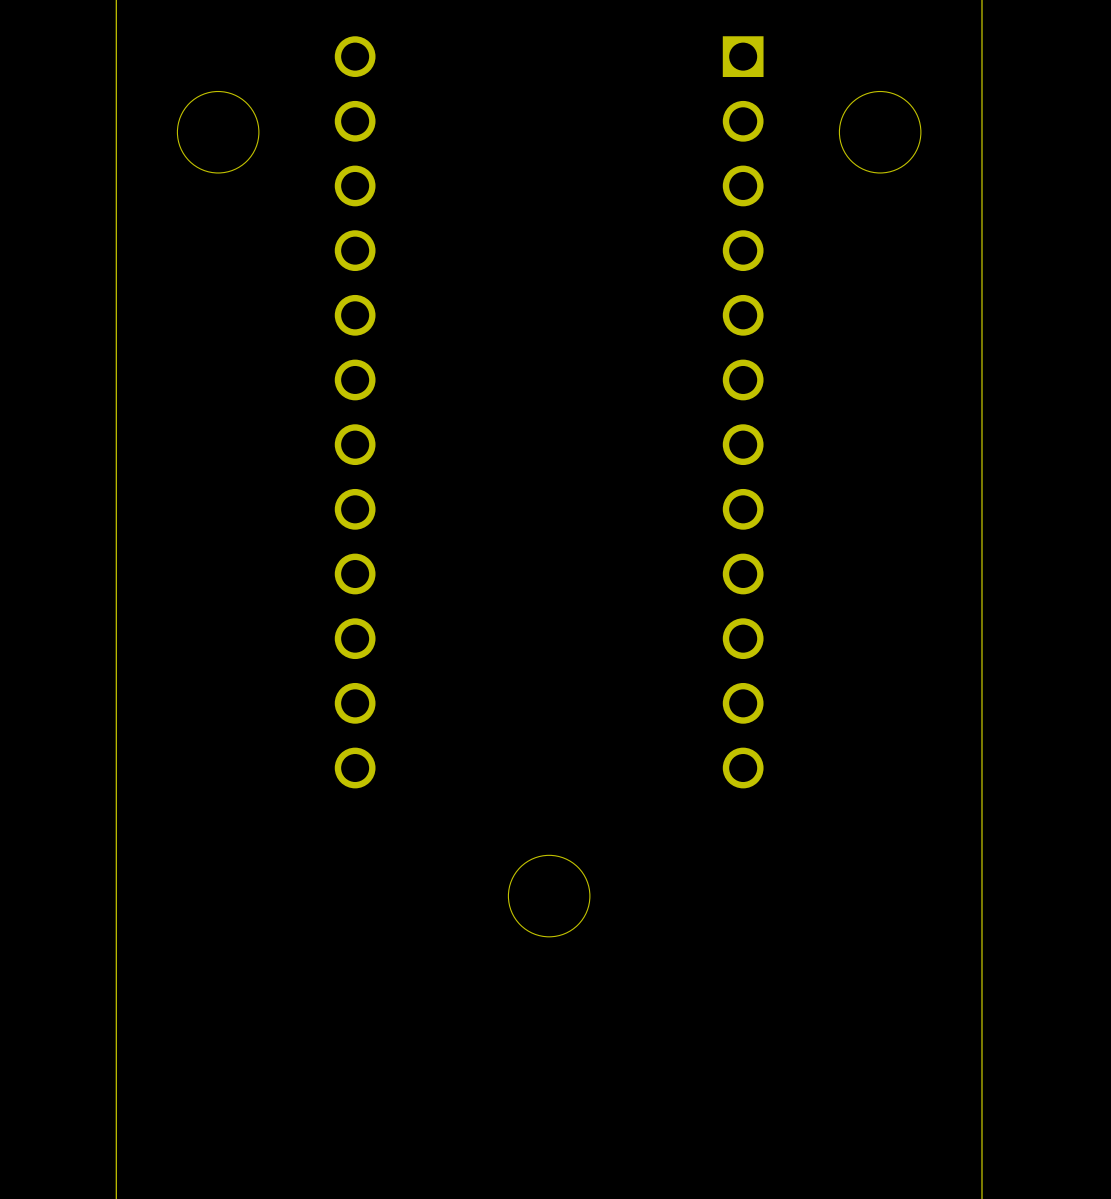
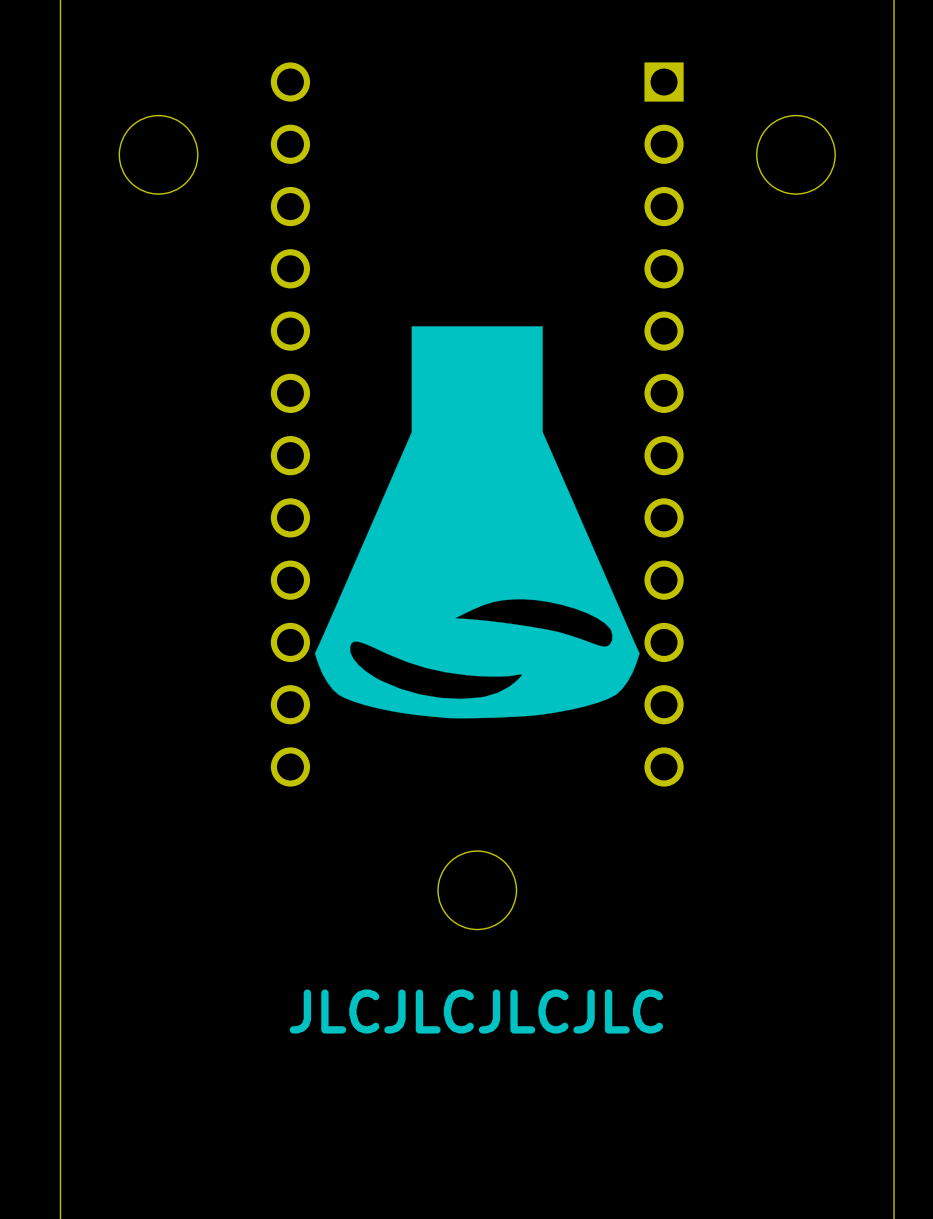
drawing: none -> [314, 326, 640, 719]
text: none -> JLCJLCJLCJLC (476, 1011)

